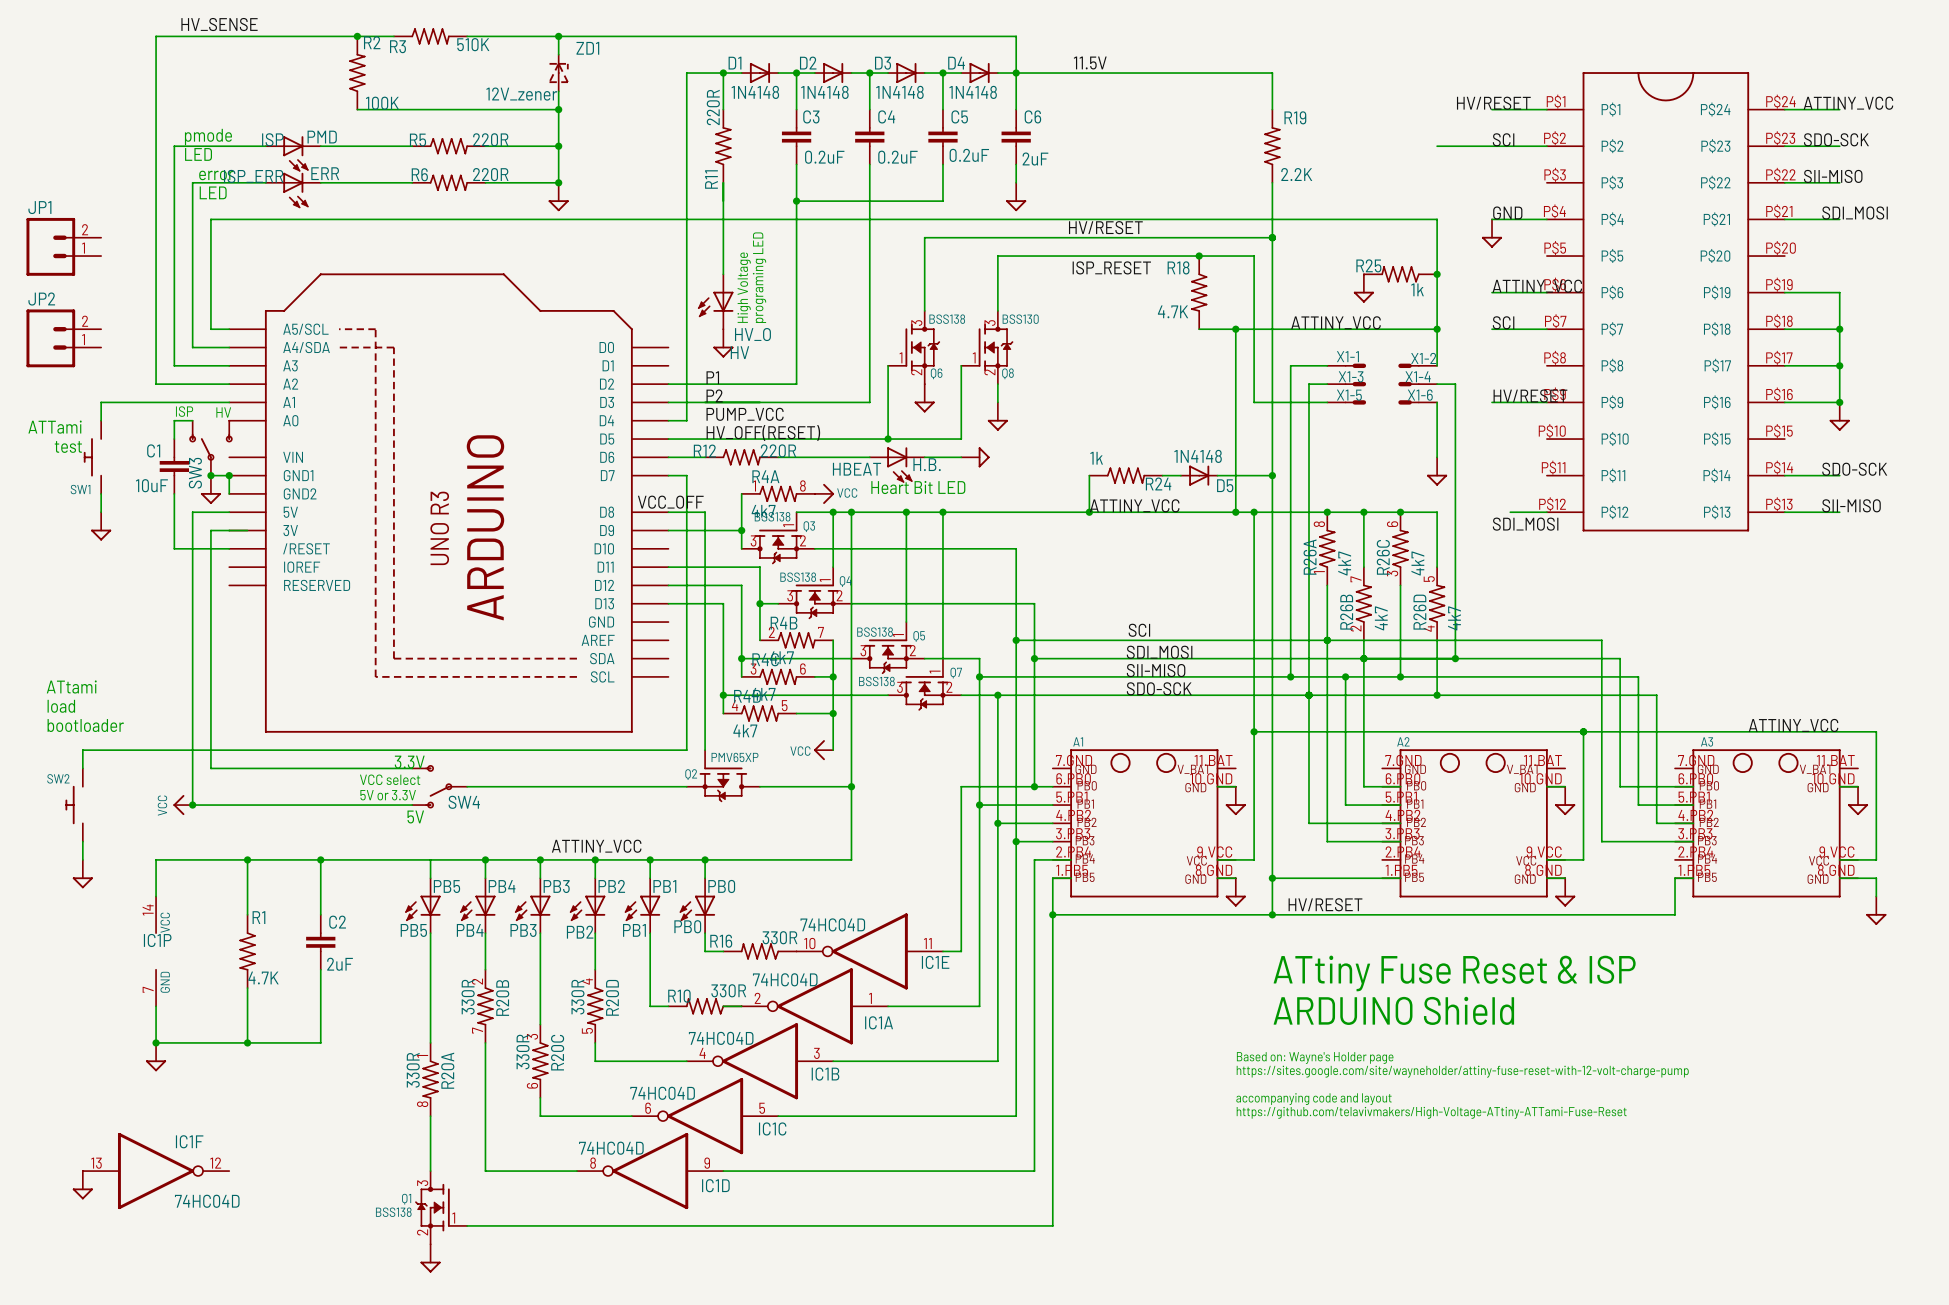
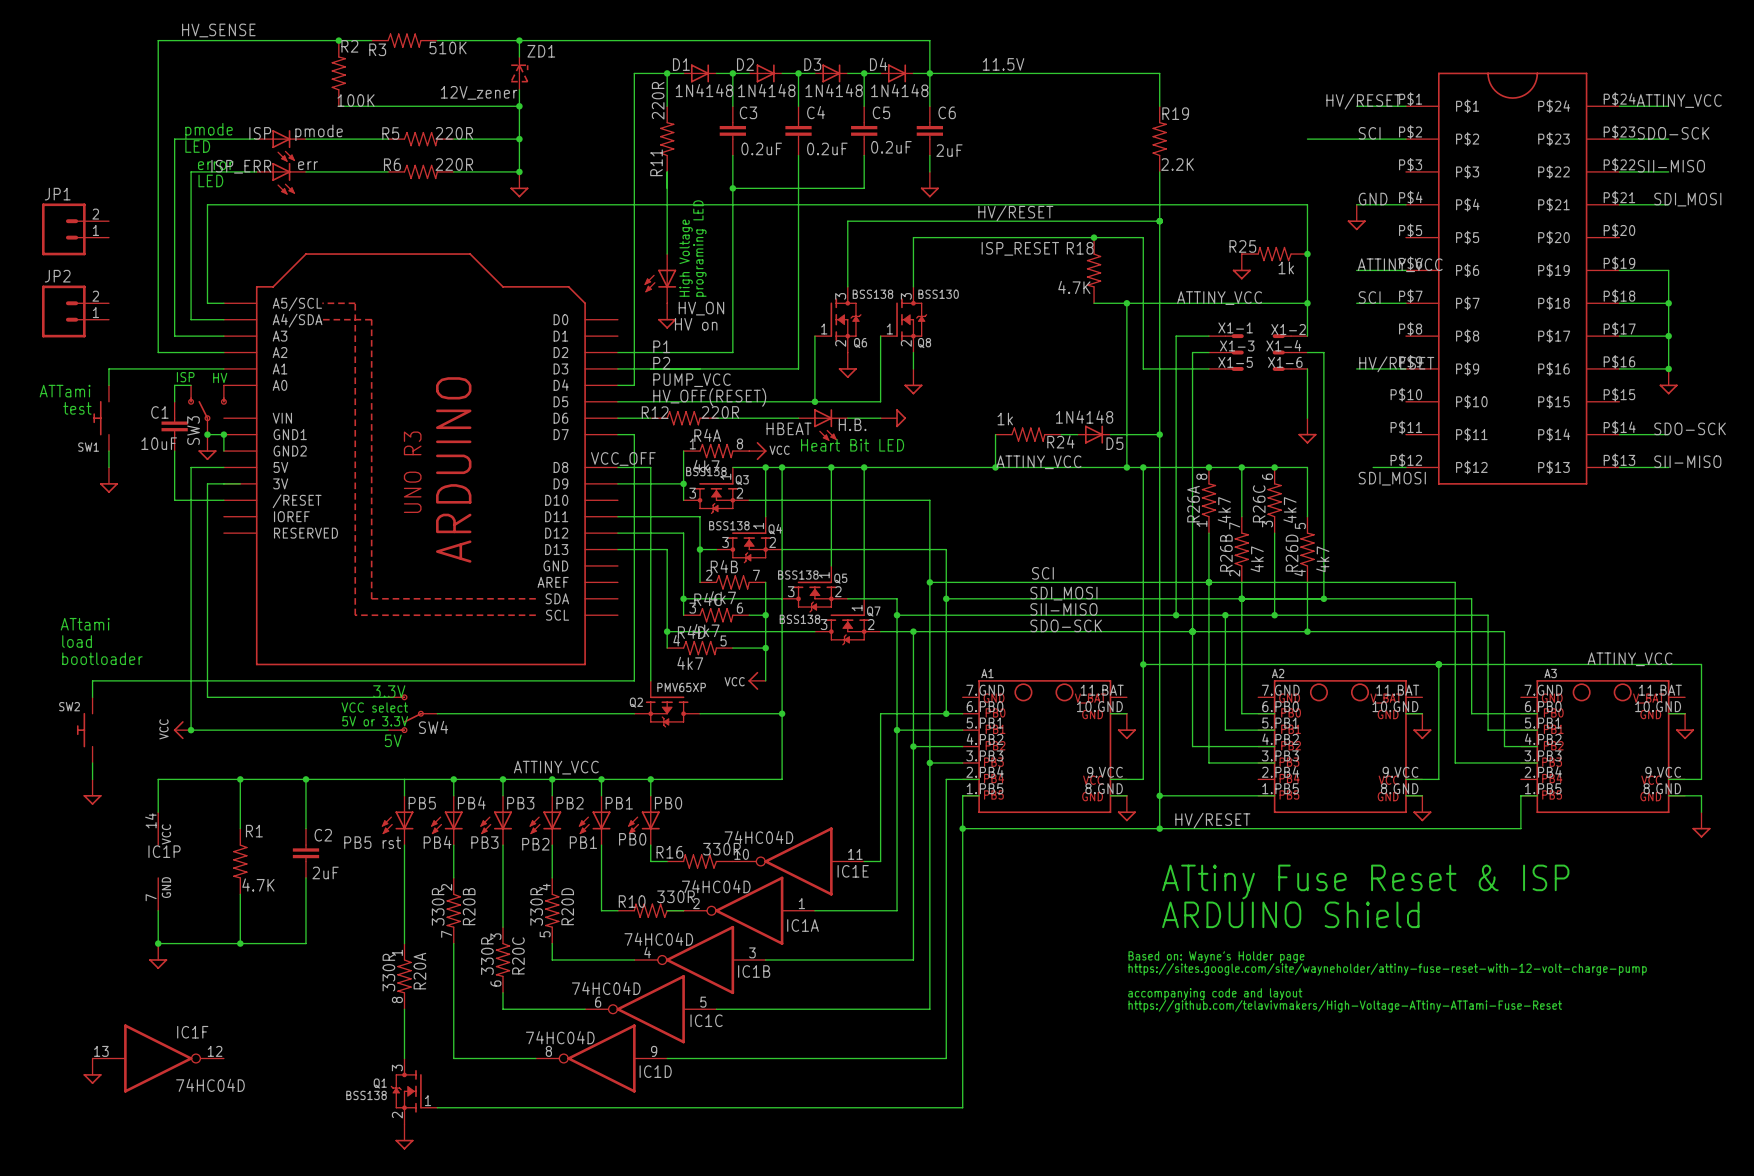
ISP value: PMD (322, 137) -> pmode (319, 132)
ISP_ERR value: ERR (325, 173) -> err (308, 165)
HV_O name: HV_O (752, 334) -> HV_ON (701, 308)
HV_O value: HV (739, 352) -> HV on (696, 324)
PB5 value: PB5 (413, 930) -> PB5 rst (372, 842)

